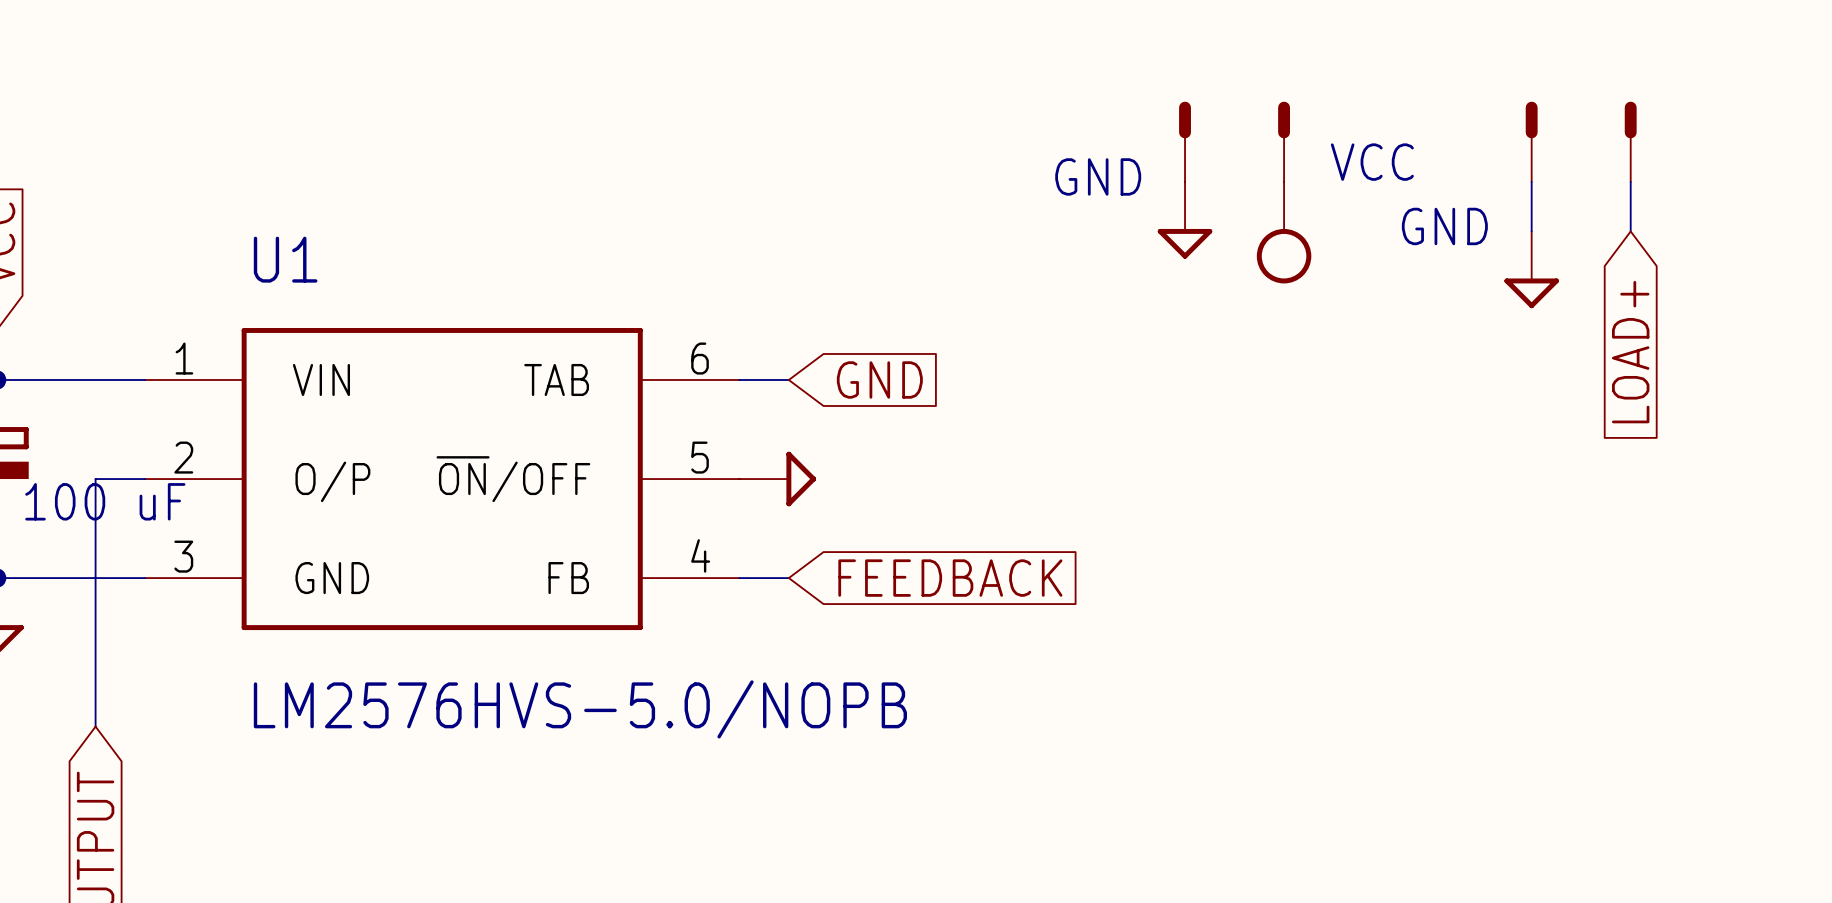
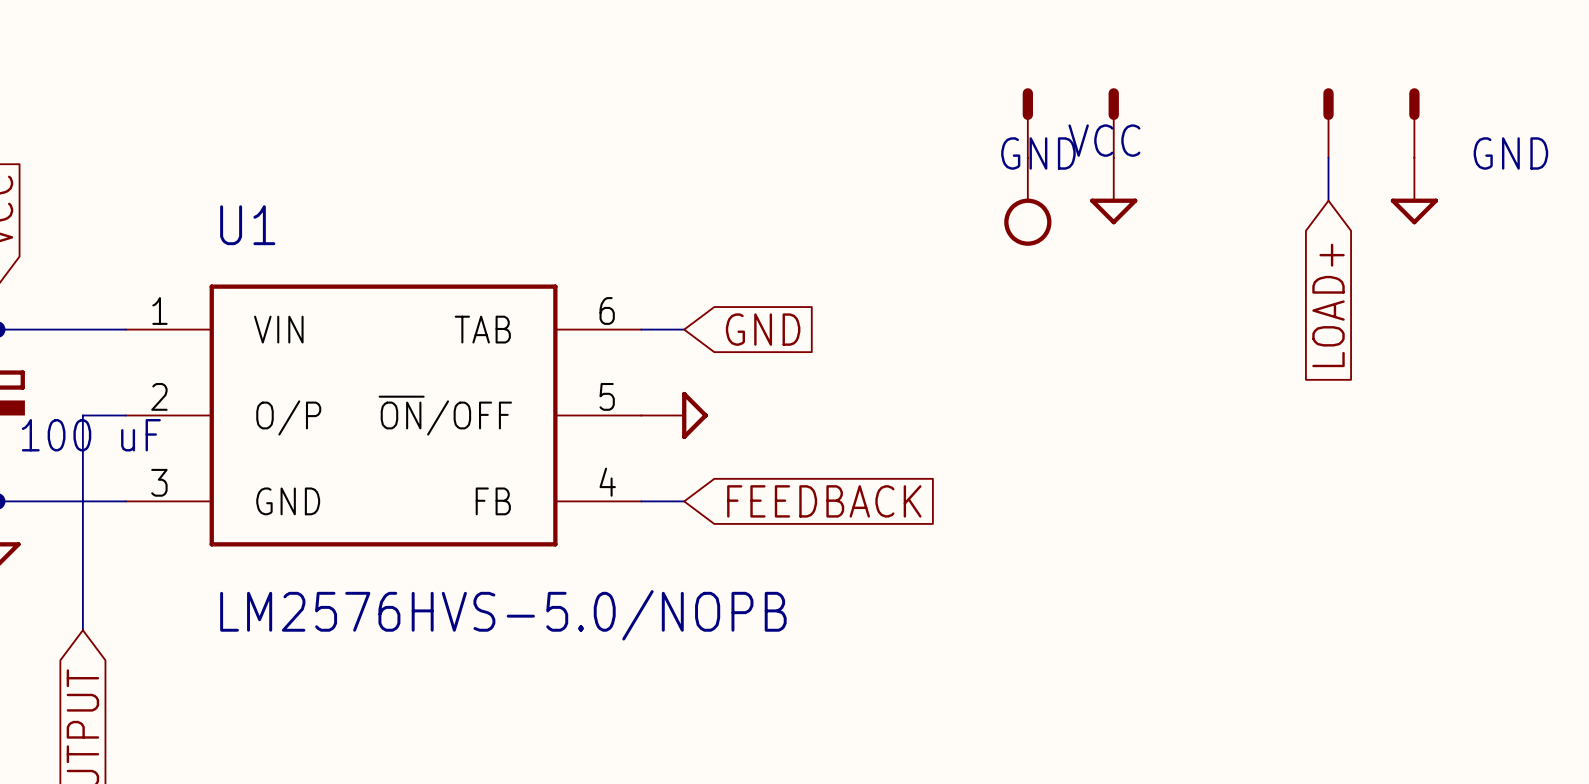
power symbol: GND (1185, 220) -> VCC (1027, 201)
power symbol text position: GND (1444, 226) -> GND (1510, 153)
power symbol: VCC (1284, 232) -> GND (1113, 191)
power symbol position: GND (1531, 269) -> GND (1414, 191)
global label position: LOAD+ (1630, 352) -> LOAD+ (1328, 305)

